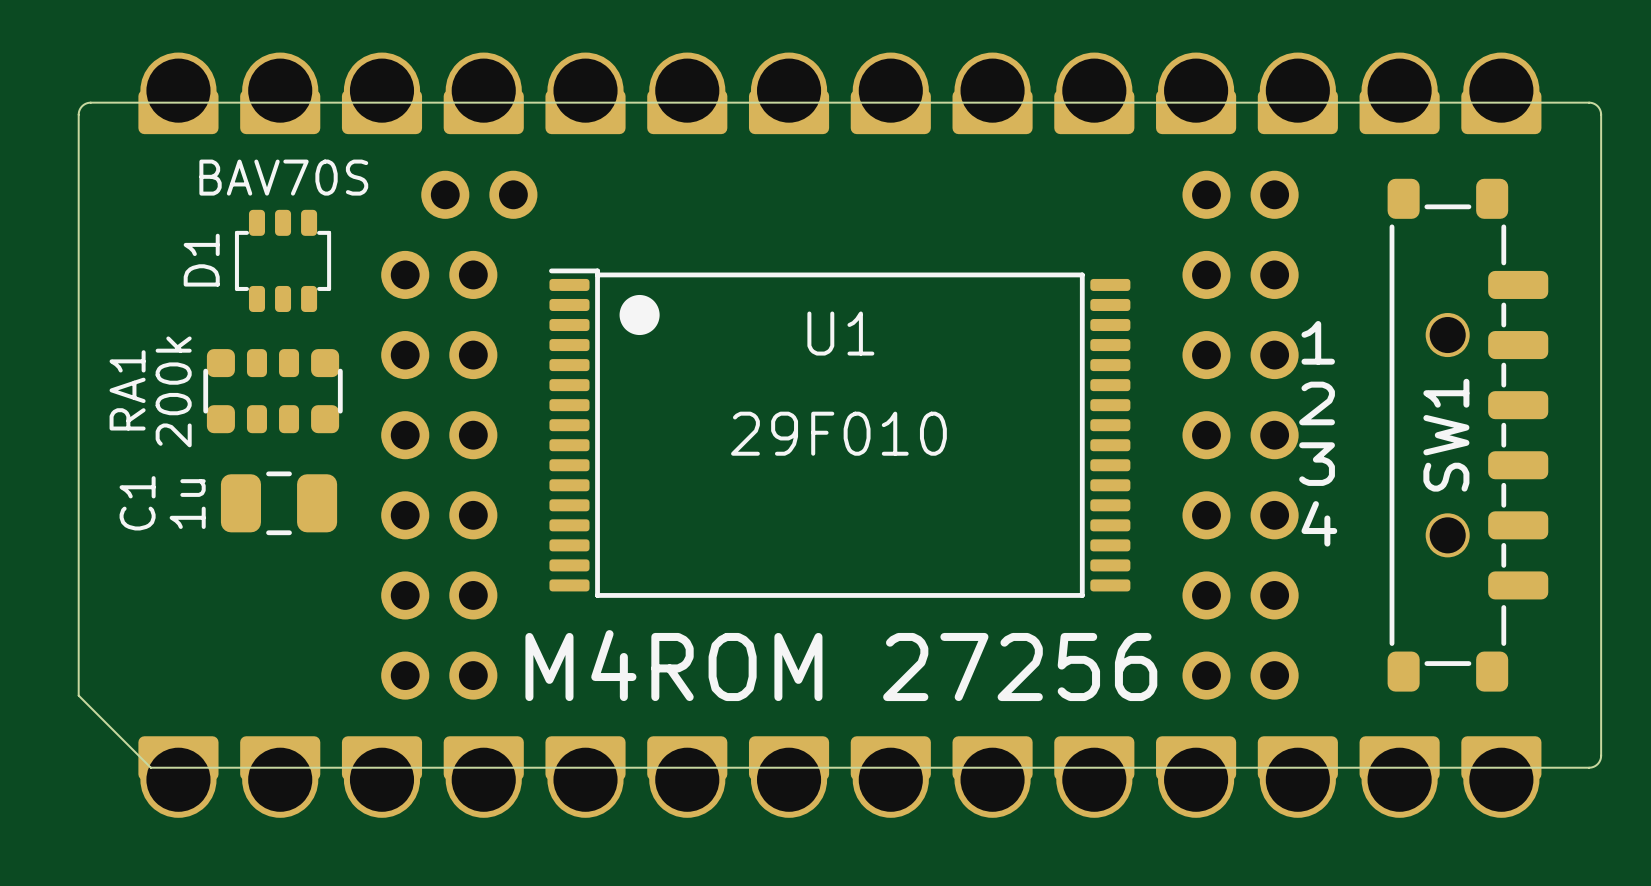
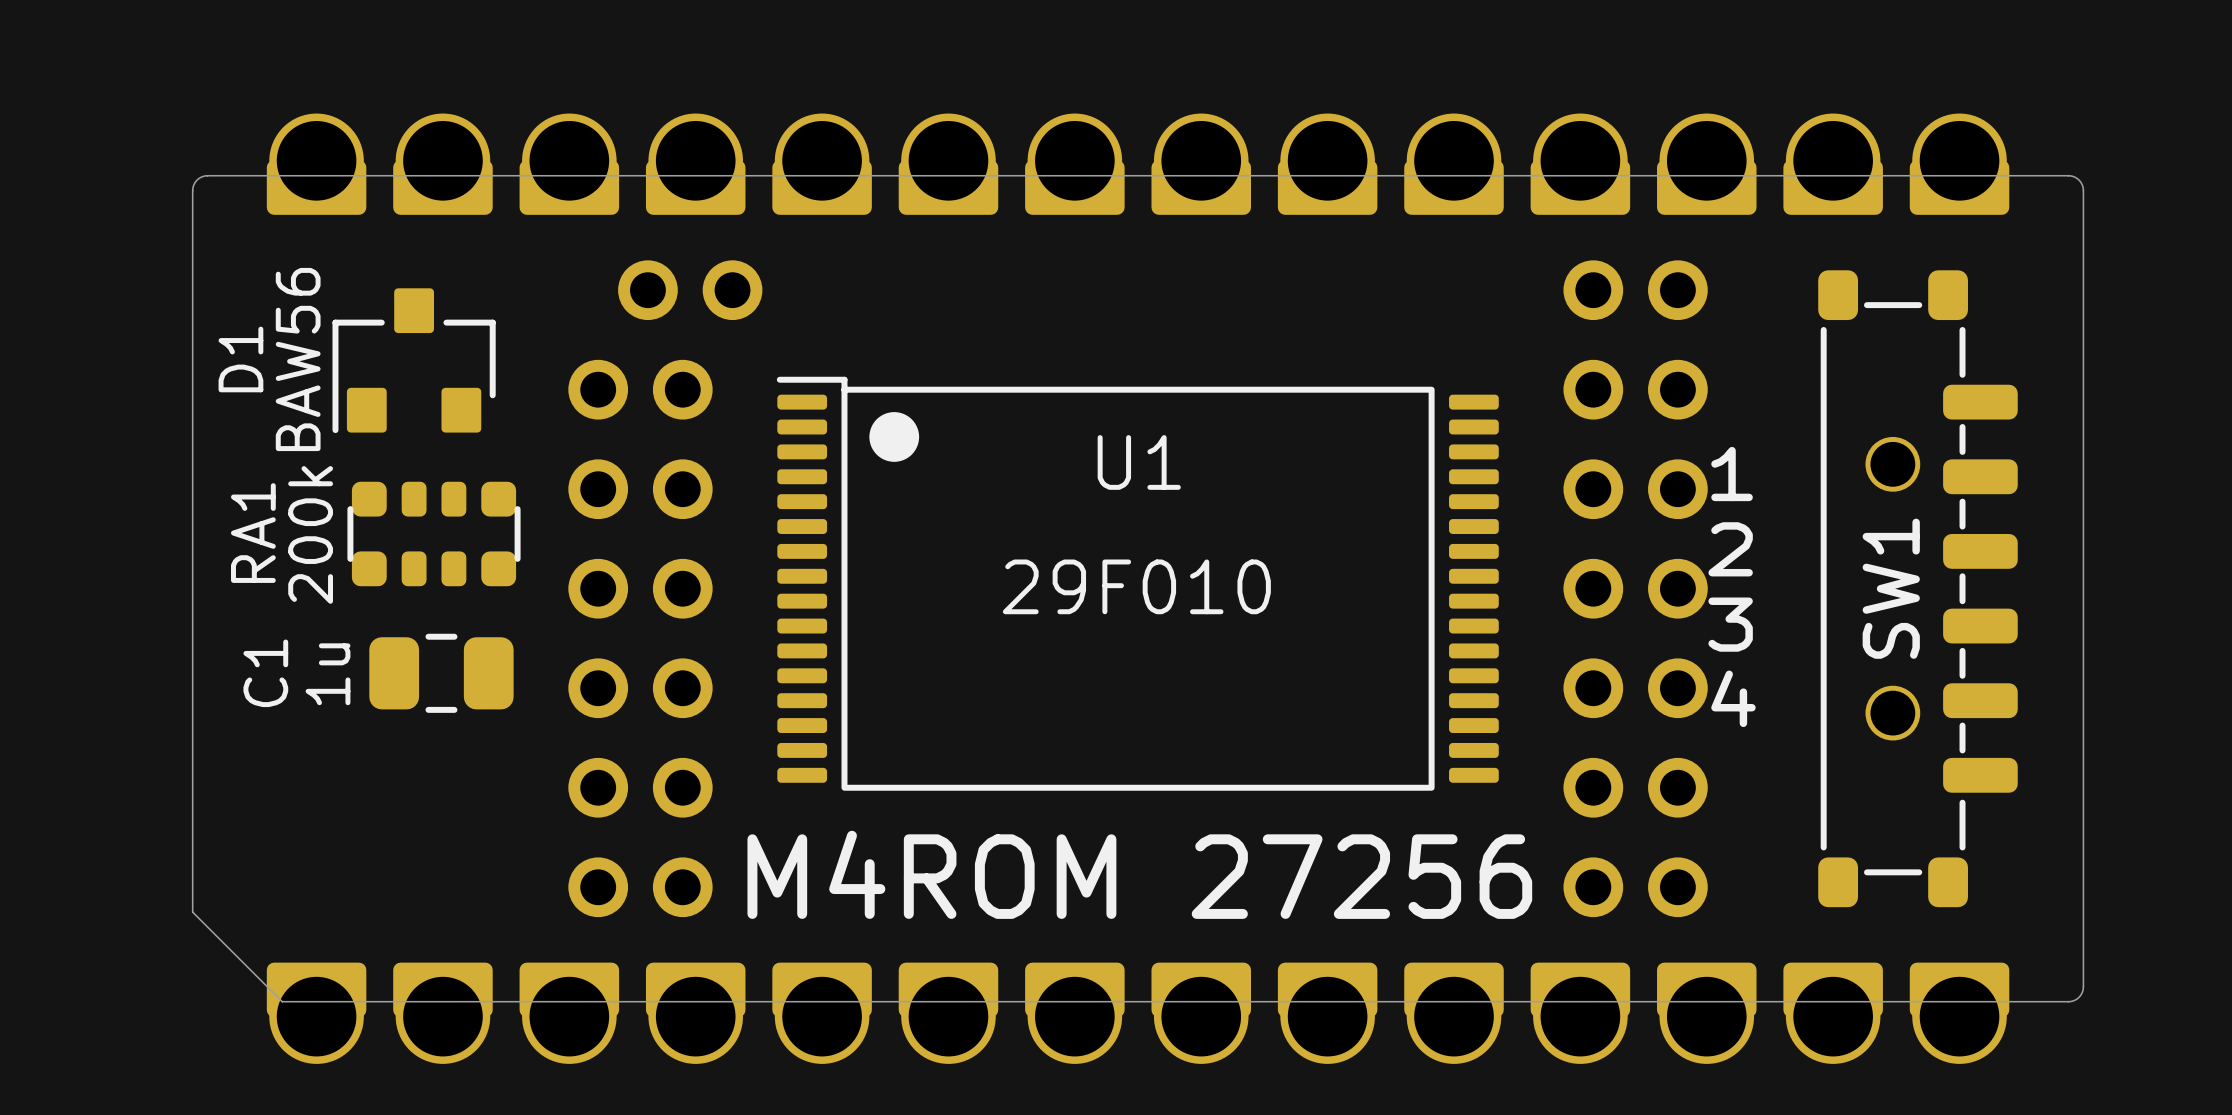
D1 value: BAV70S (283, 177) -> BAW56 (298, 359)
D1 footprint: [234, 209, 332, 312] -> [332, 288, 496, 434]
U1 footprint: [549, 268, 1131, 598] -> [776, 376, 1499, 791]

